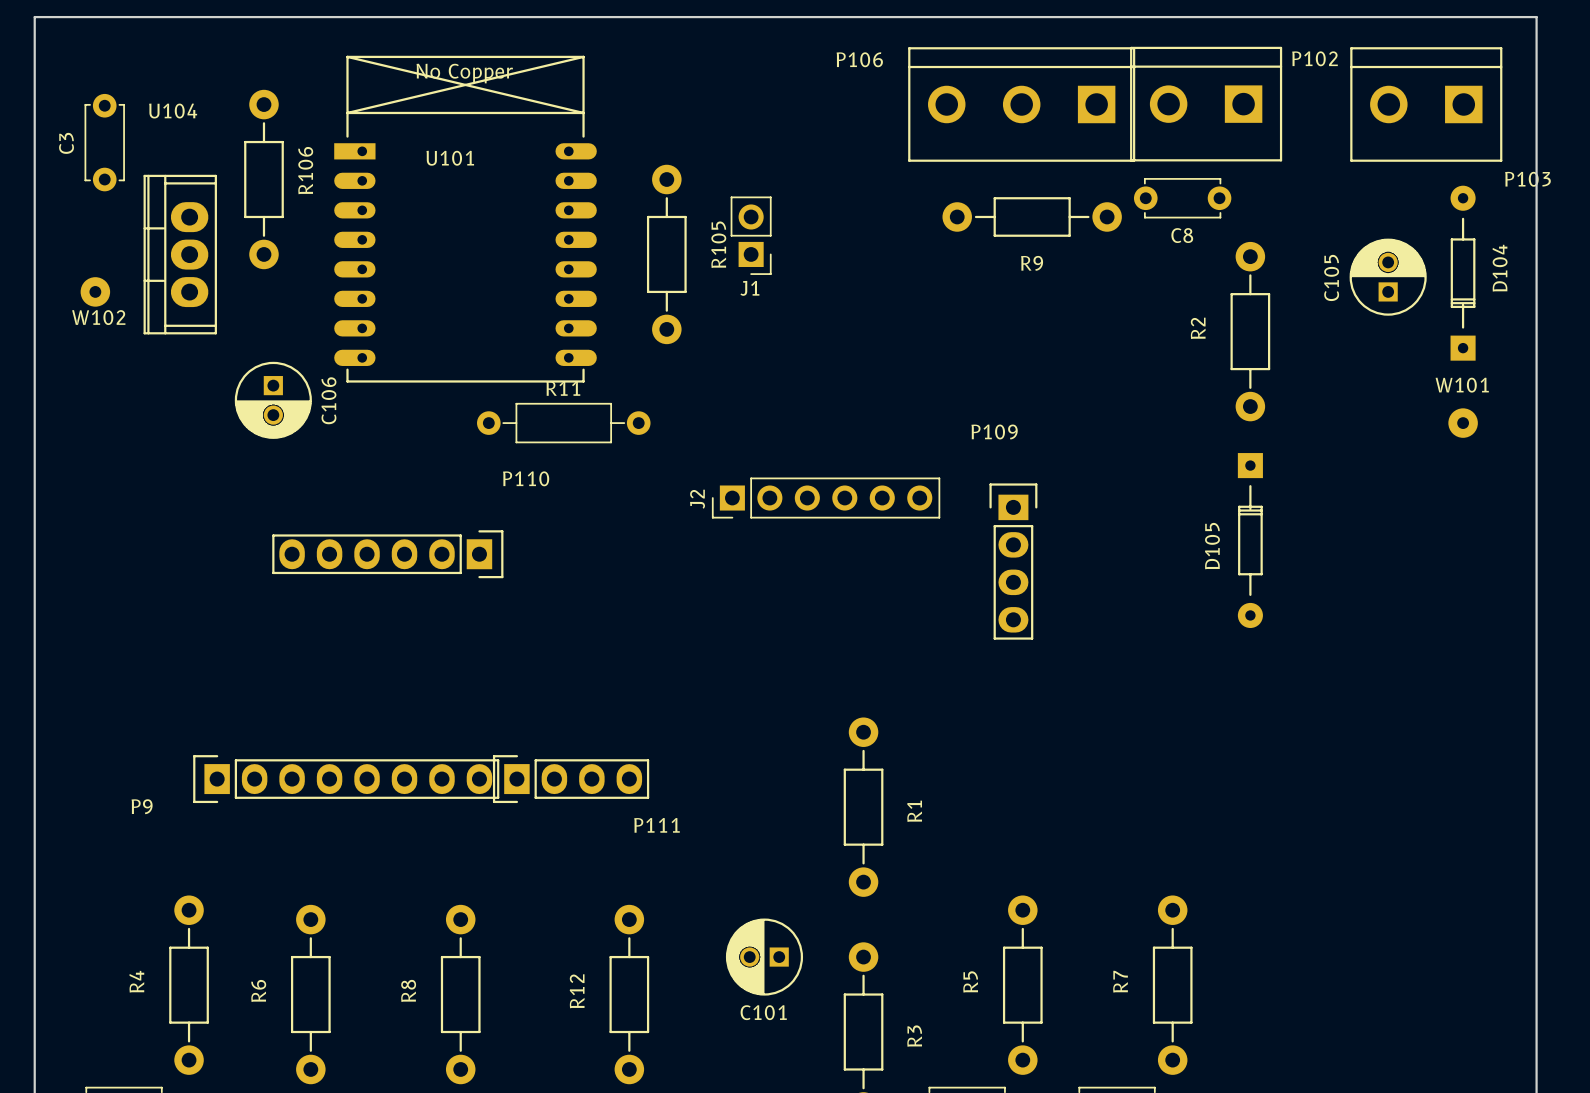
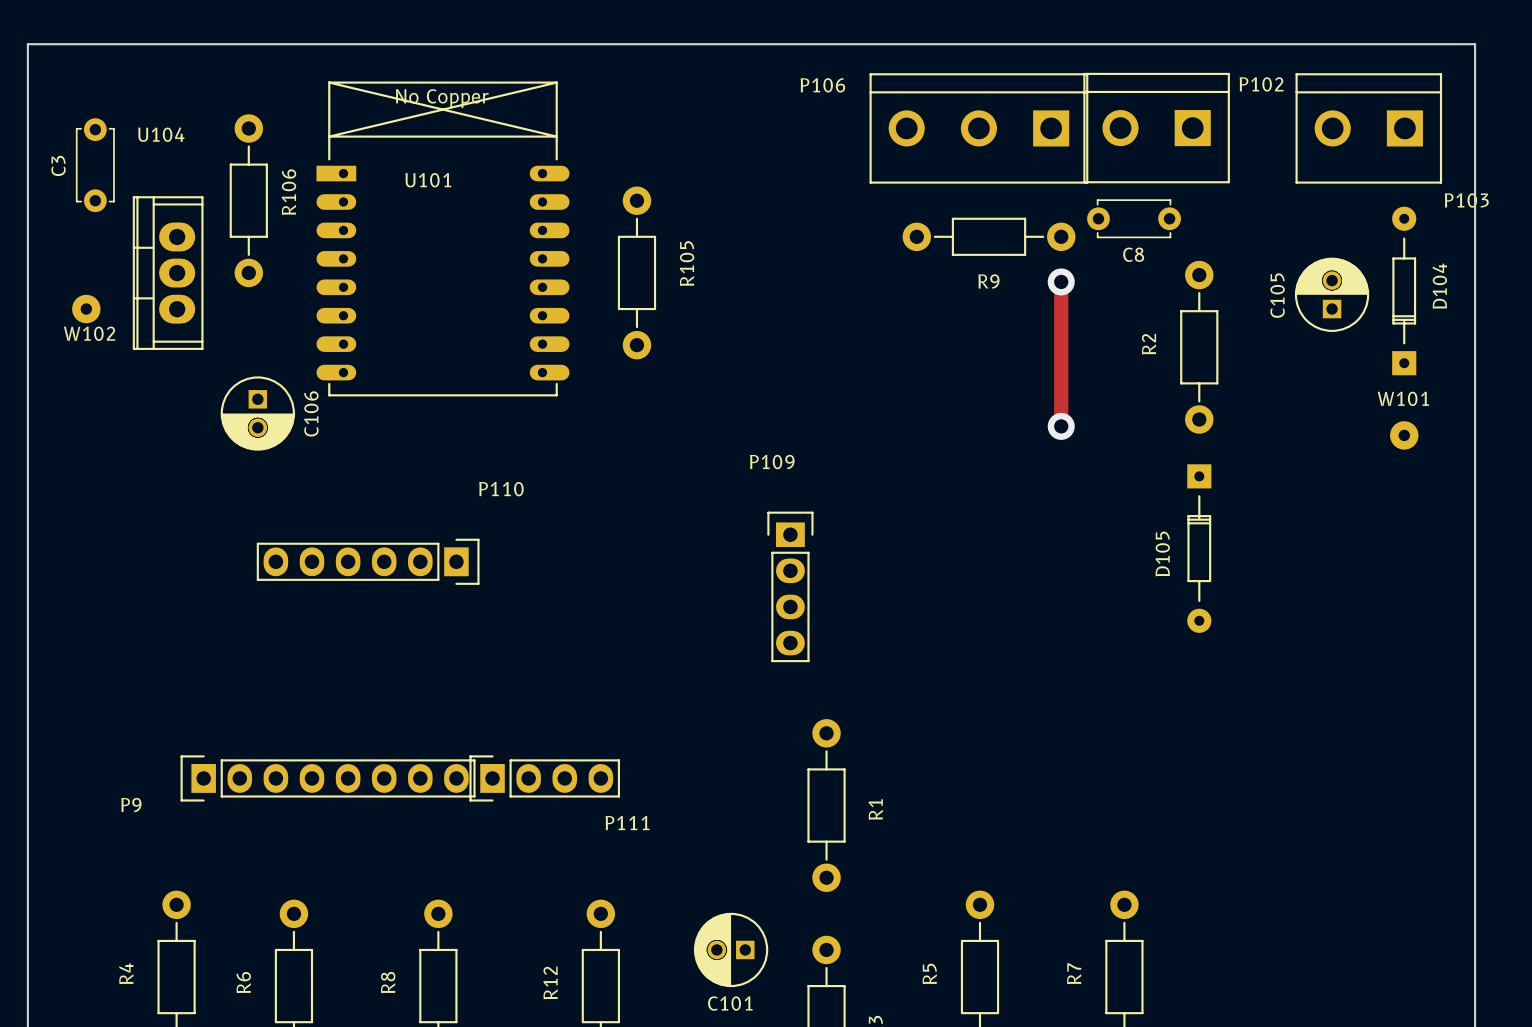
J1: (751, 235) -> none
track: none -> (1061, 281) (1061, 426)
via: none -> (1061, 281)
via: none -> (1061, 426)
R11: (563, 423) -> none
J2: (826, 498) -> none
P109 position: (1013, 561) -> (790, 586)

